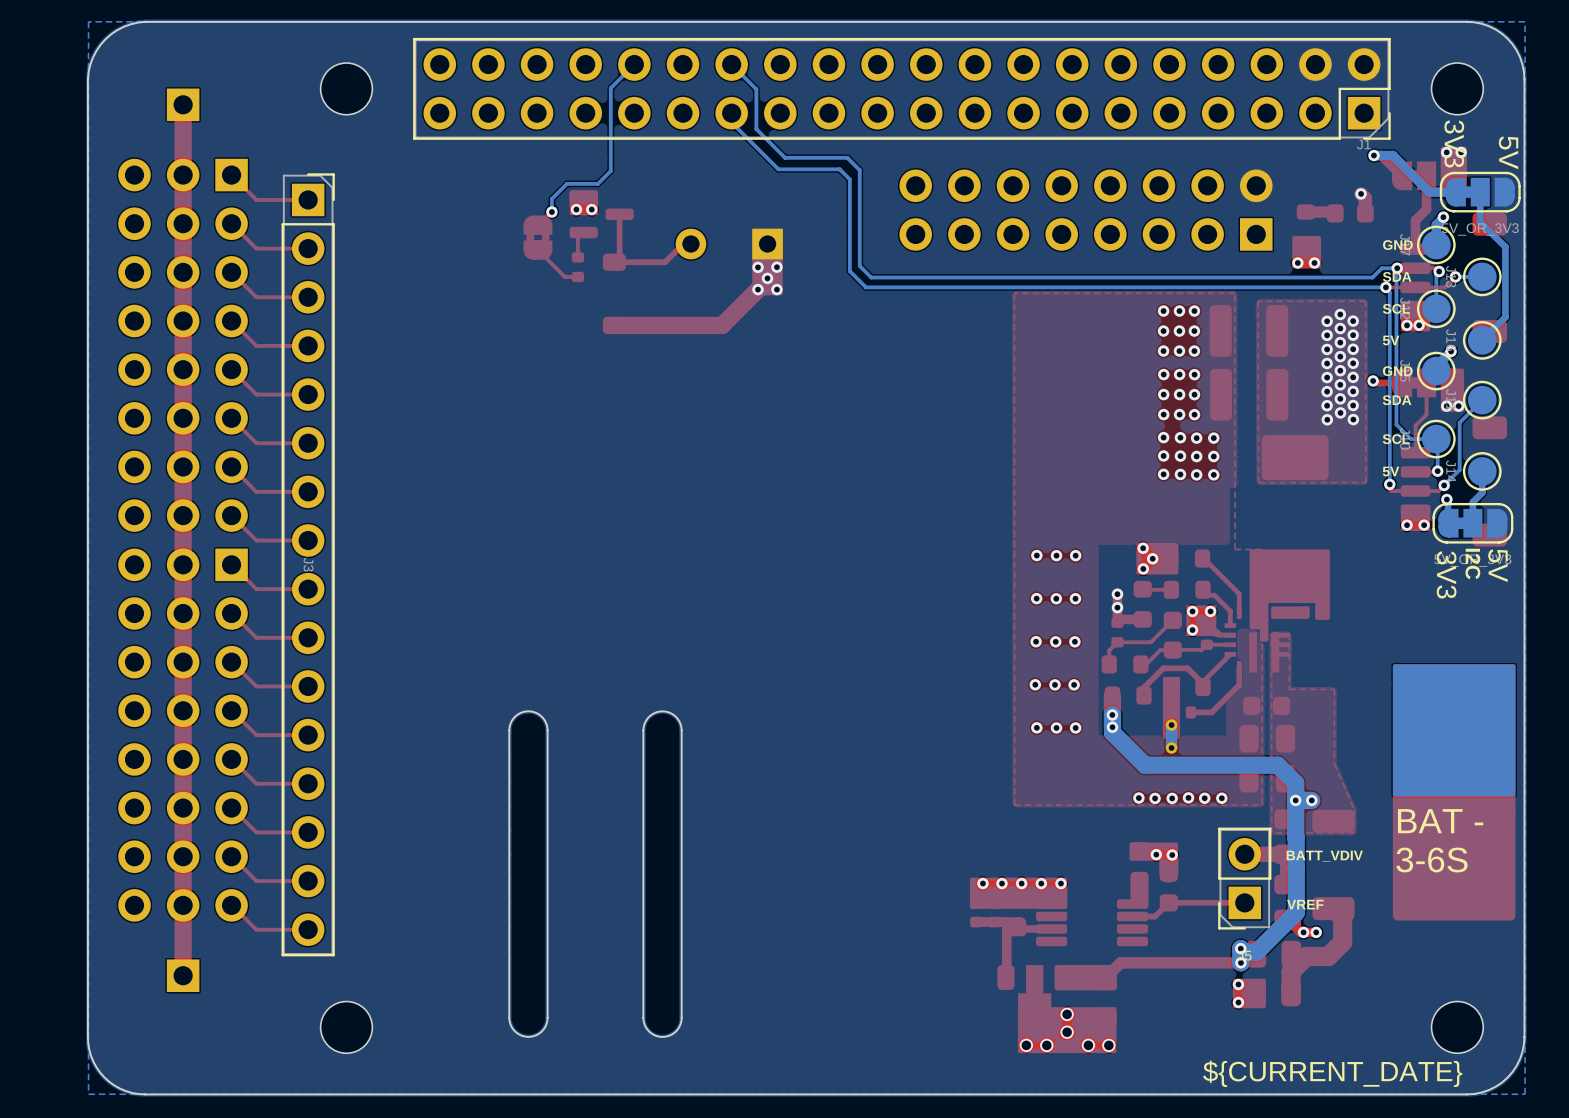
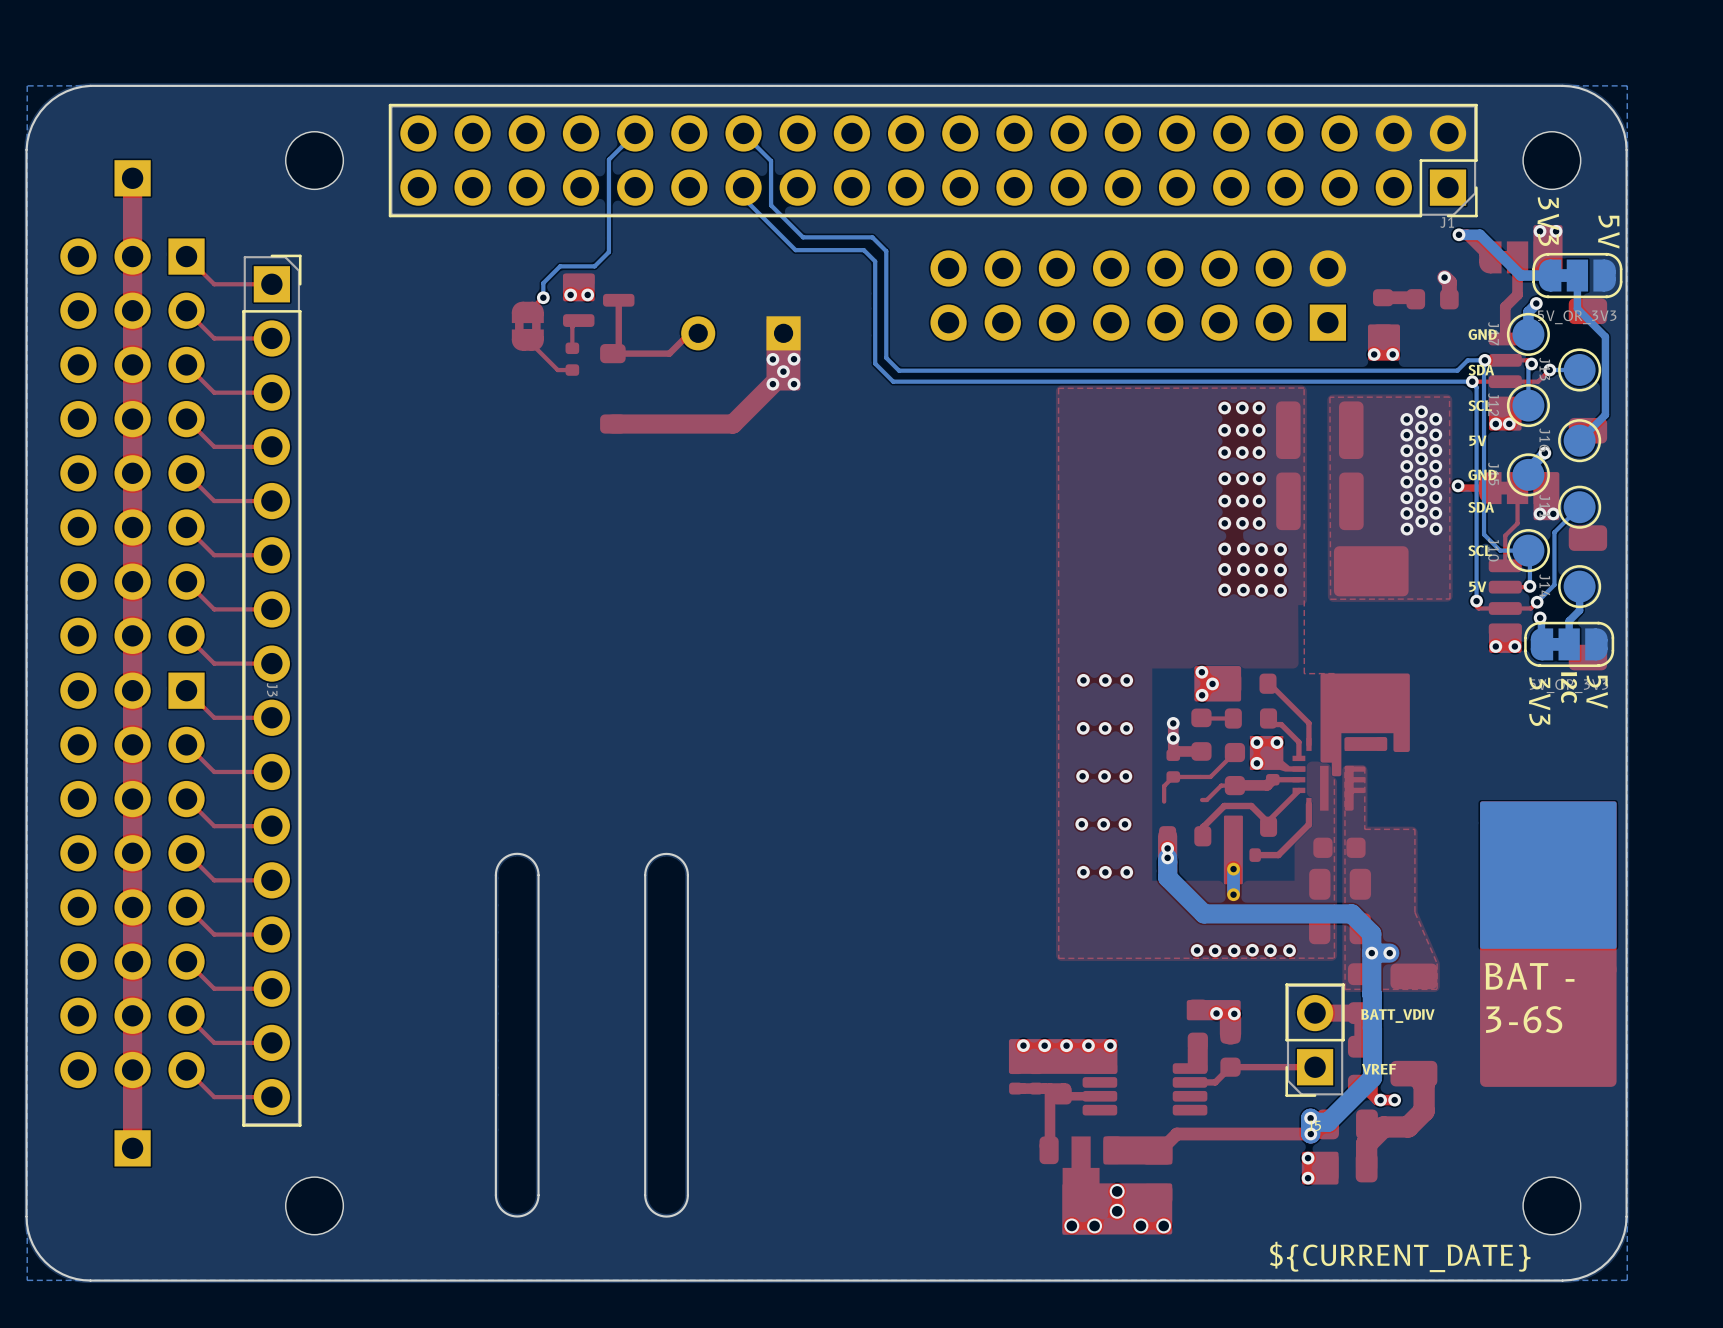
top track width: thin (1230, 644) (1206, 644) (1201, 649) (1173, 649) -> thick (1298, 779) (1272, 779) (1267, 785) (1235, 785)
part: (1125, 664) -> none
via position: (1112, 727) -> (1167, 848)

